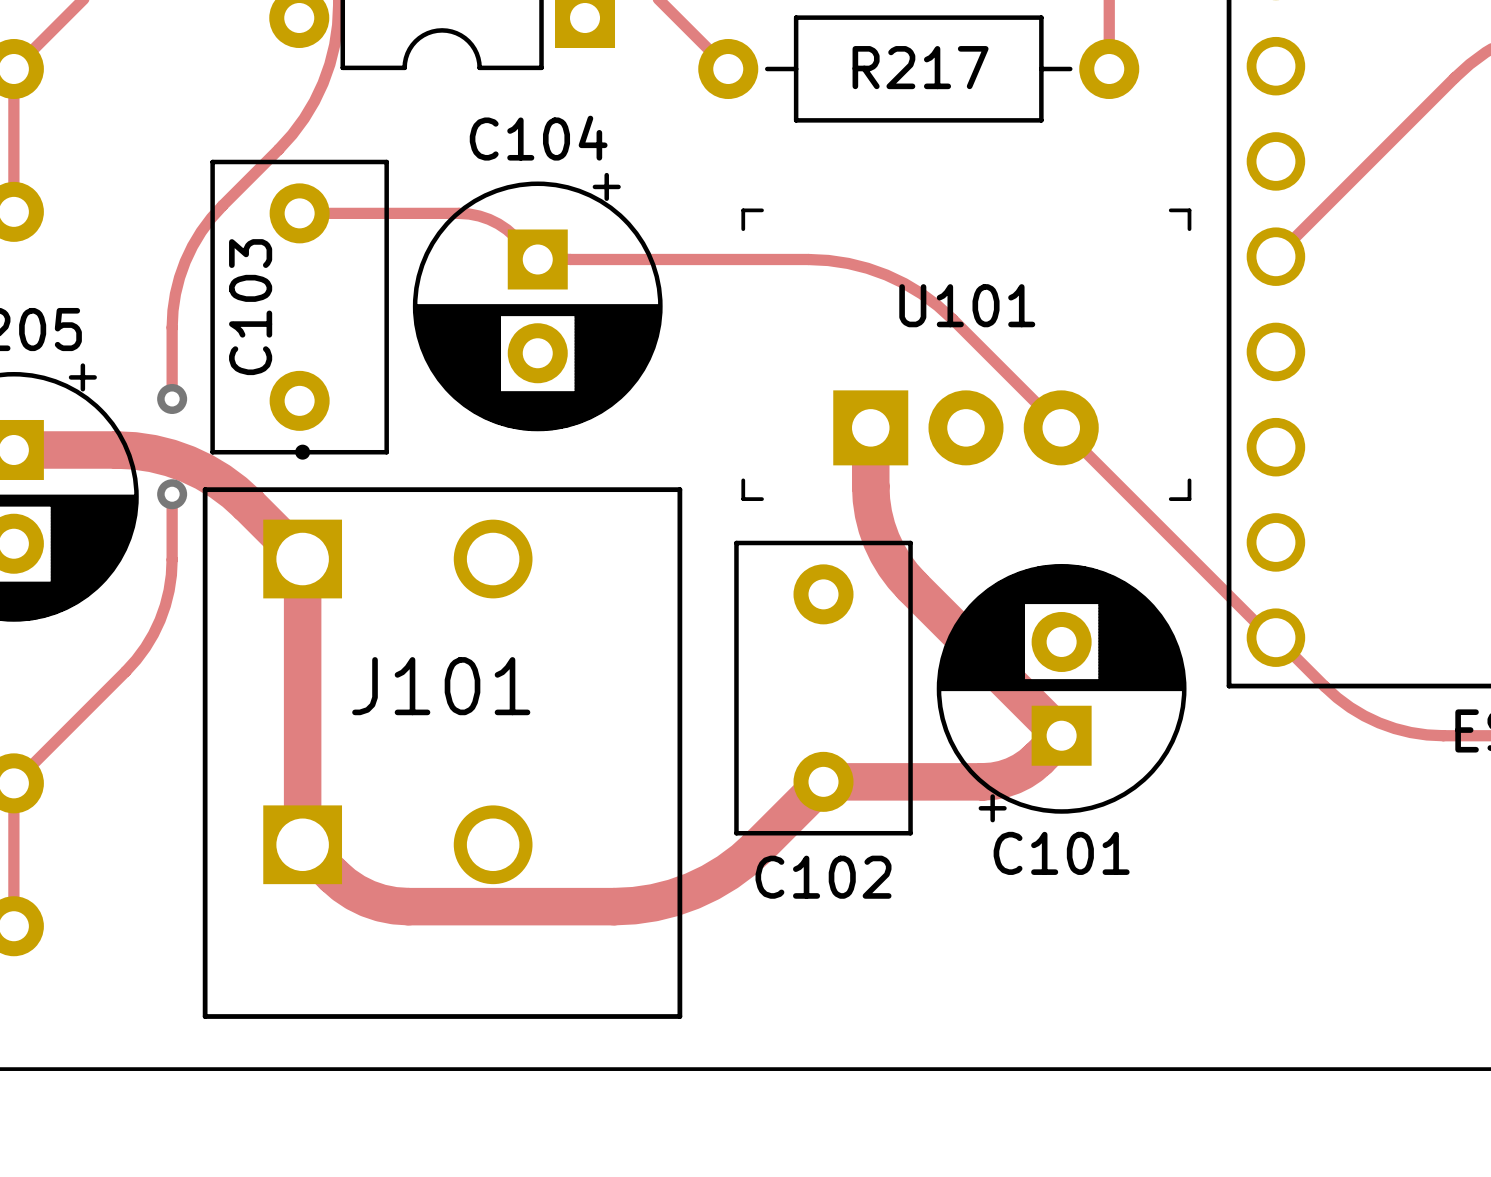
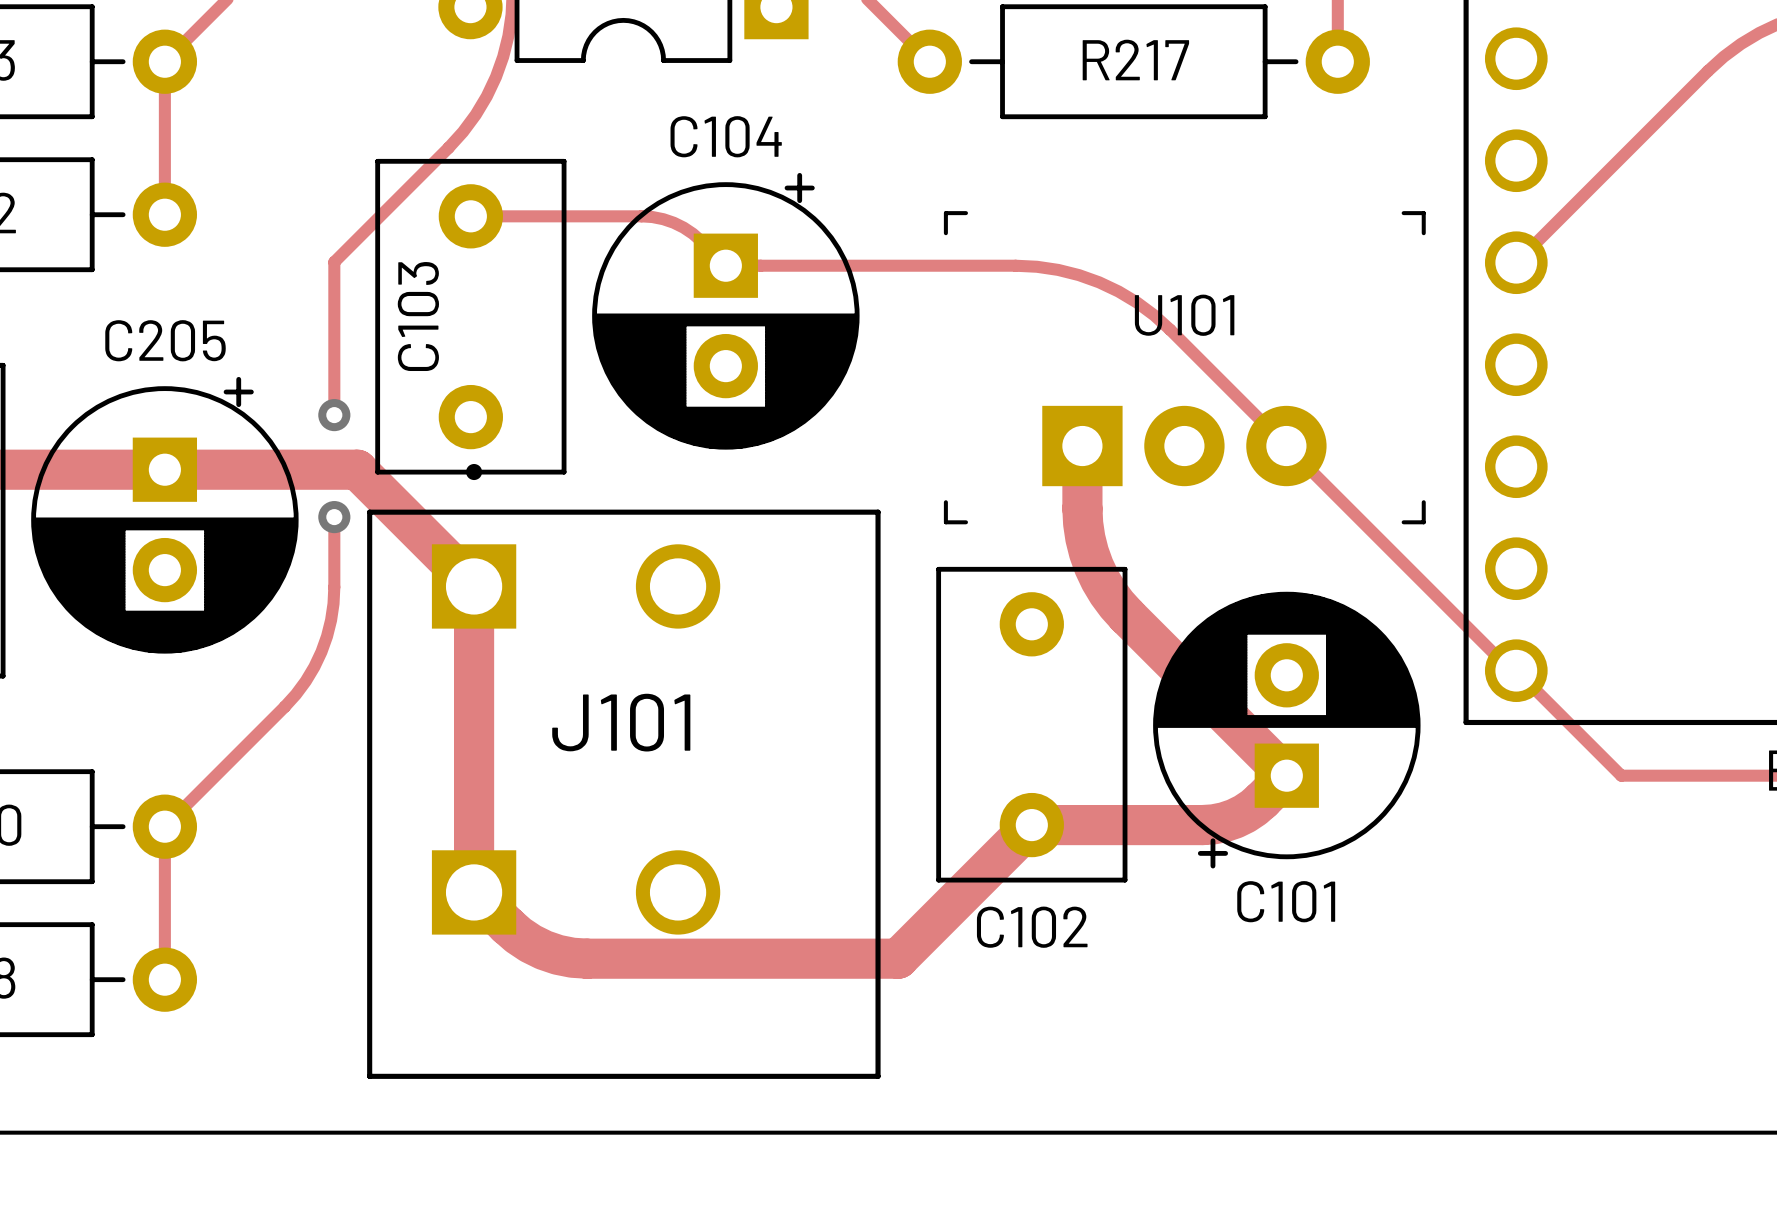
track: (222, 205) (201, 231) (185, 261) (175, 293) (172, 327) -> (388, 208) (334, 262) (334, 338)
track: (116, 449) (152, 453) (187, 464) (219, 481) (248, 504) -> (274, 469) (357, 469) (415, 528)
track: (1324, 686) (1350, 707) (1379, 722) (1410, 732) (1443, 735) -> (1568, 723) (1621, 775) (1695, 775)
track: (758, 846) (727, 872) (692, 891) (654, 902) (614, 906) -> (962, 894) (898, 958) (807, 958)

